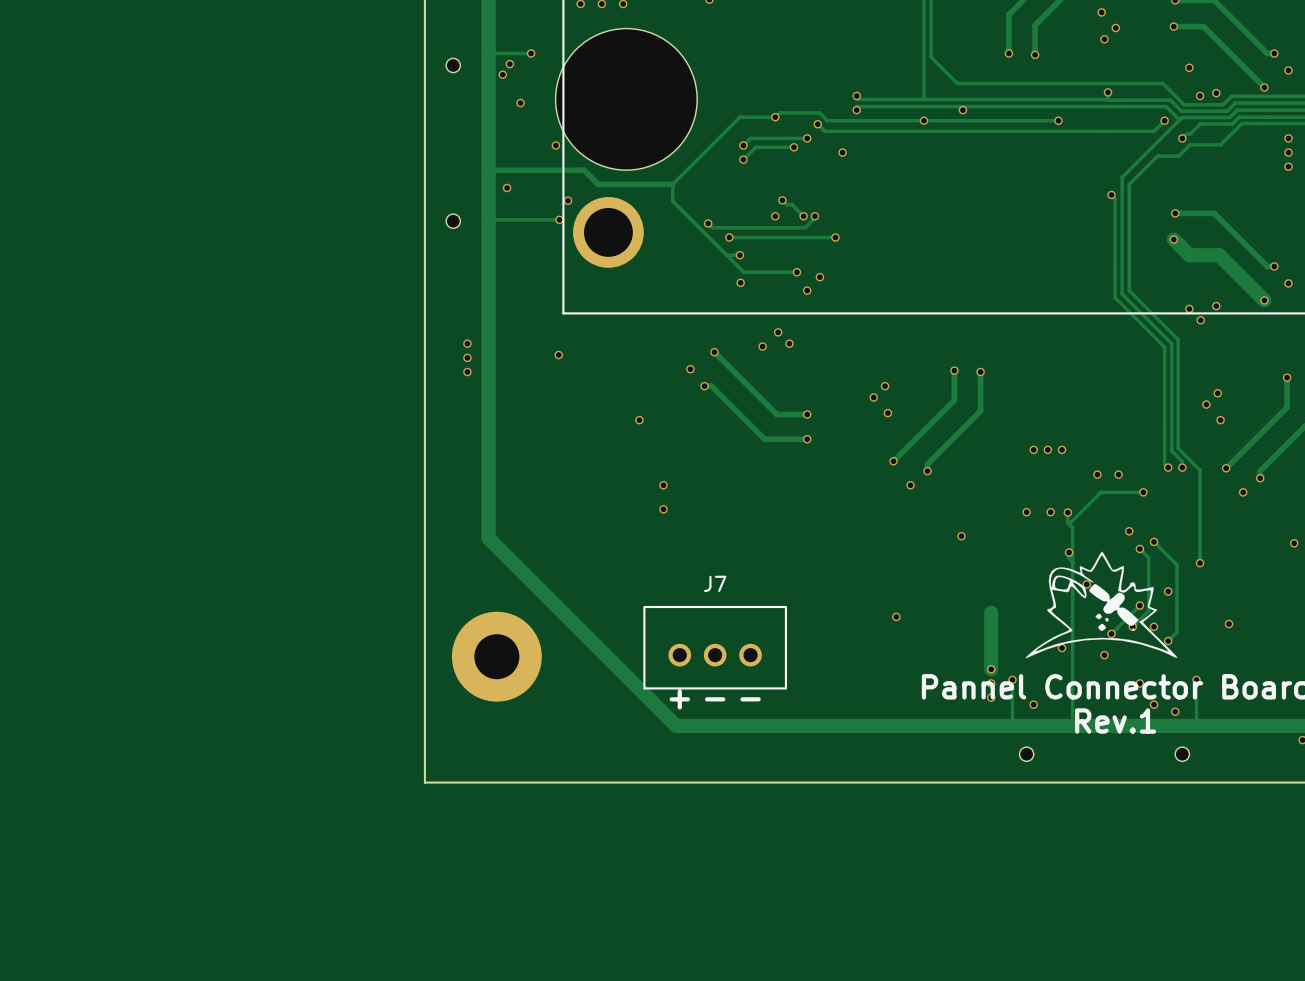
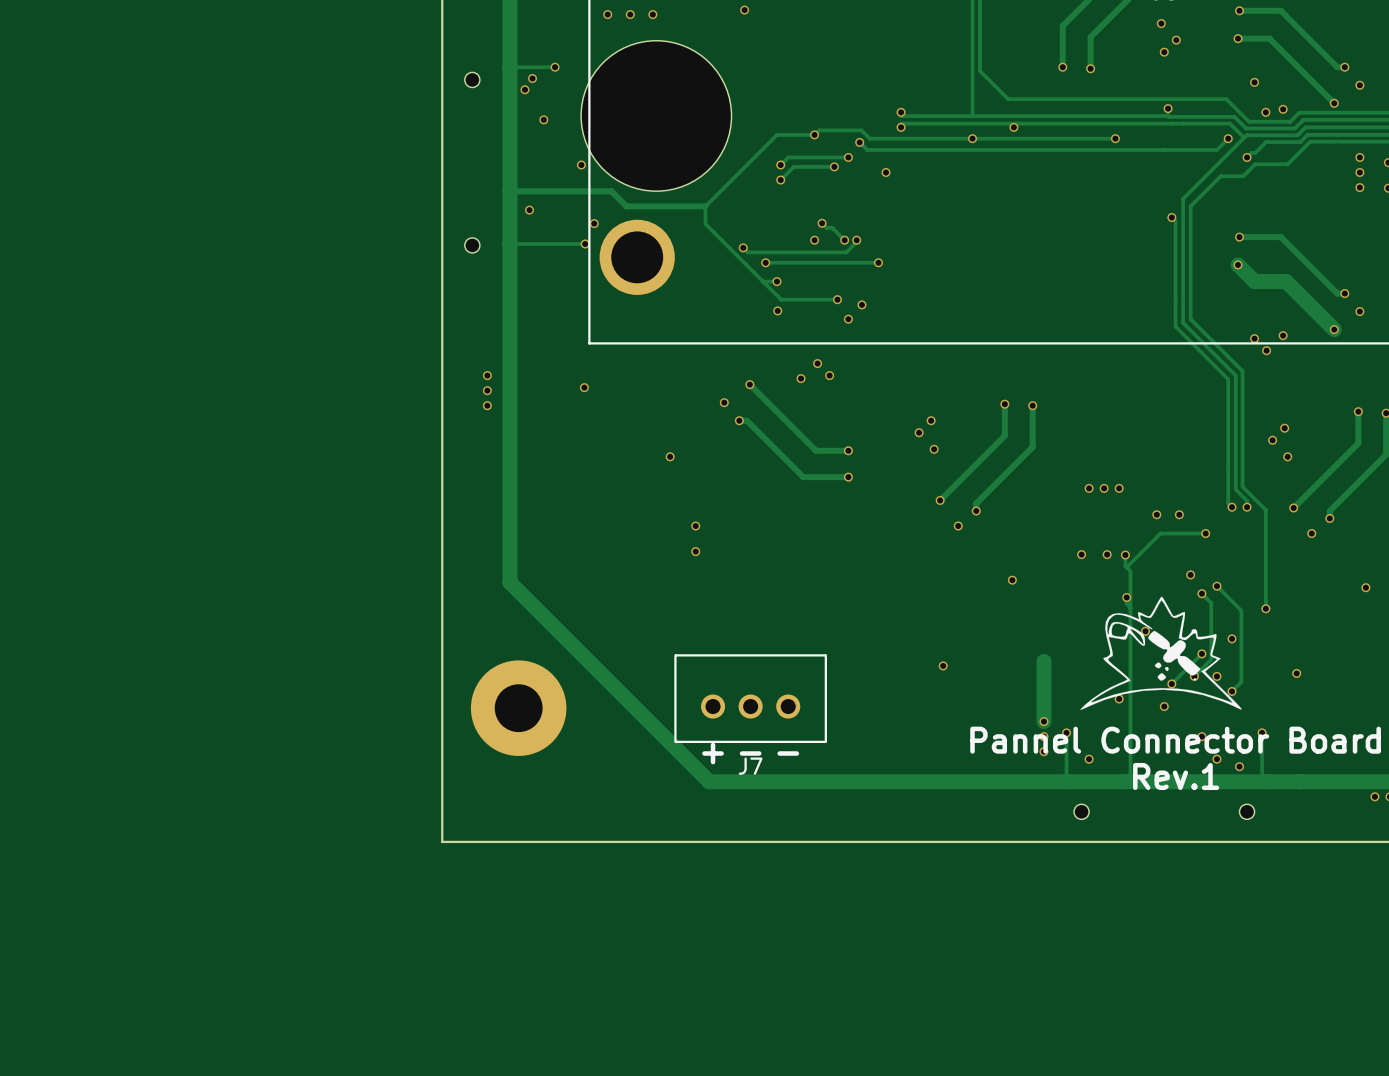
J7 name position: J7 (715, 583) -> J7 (750, 766)

